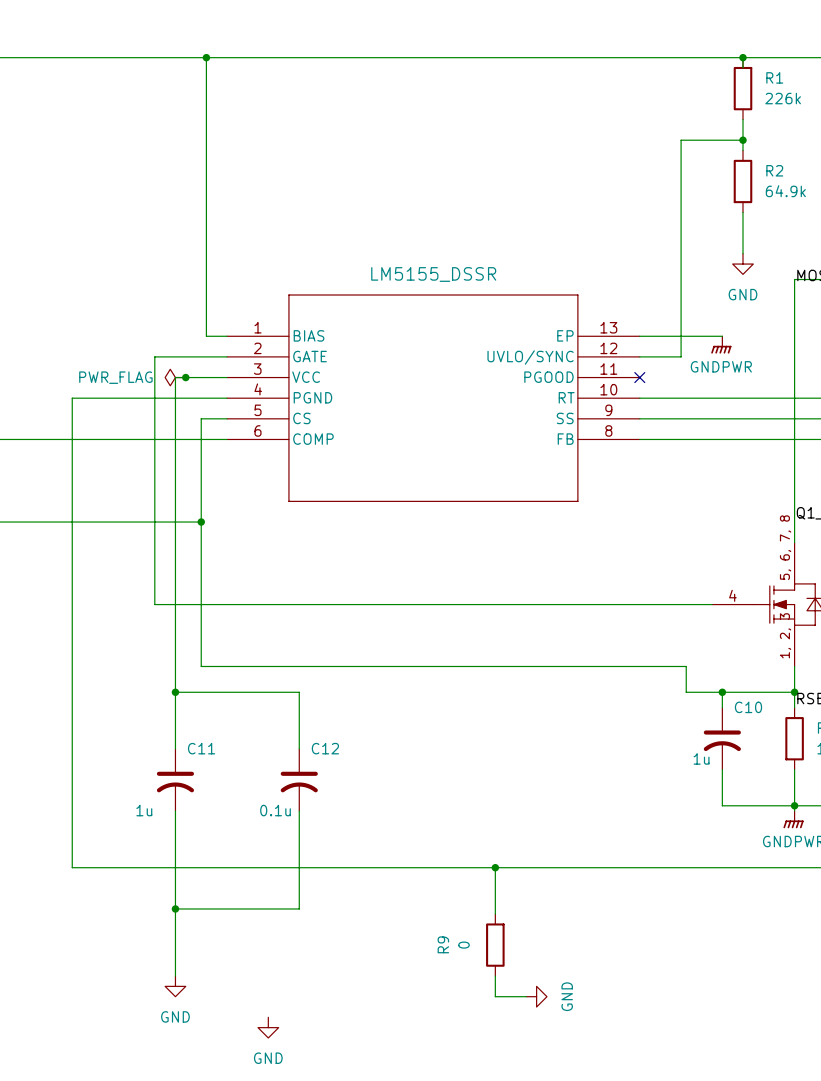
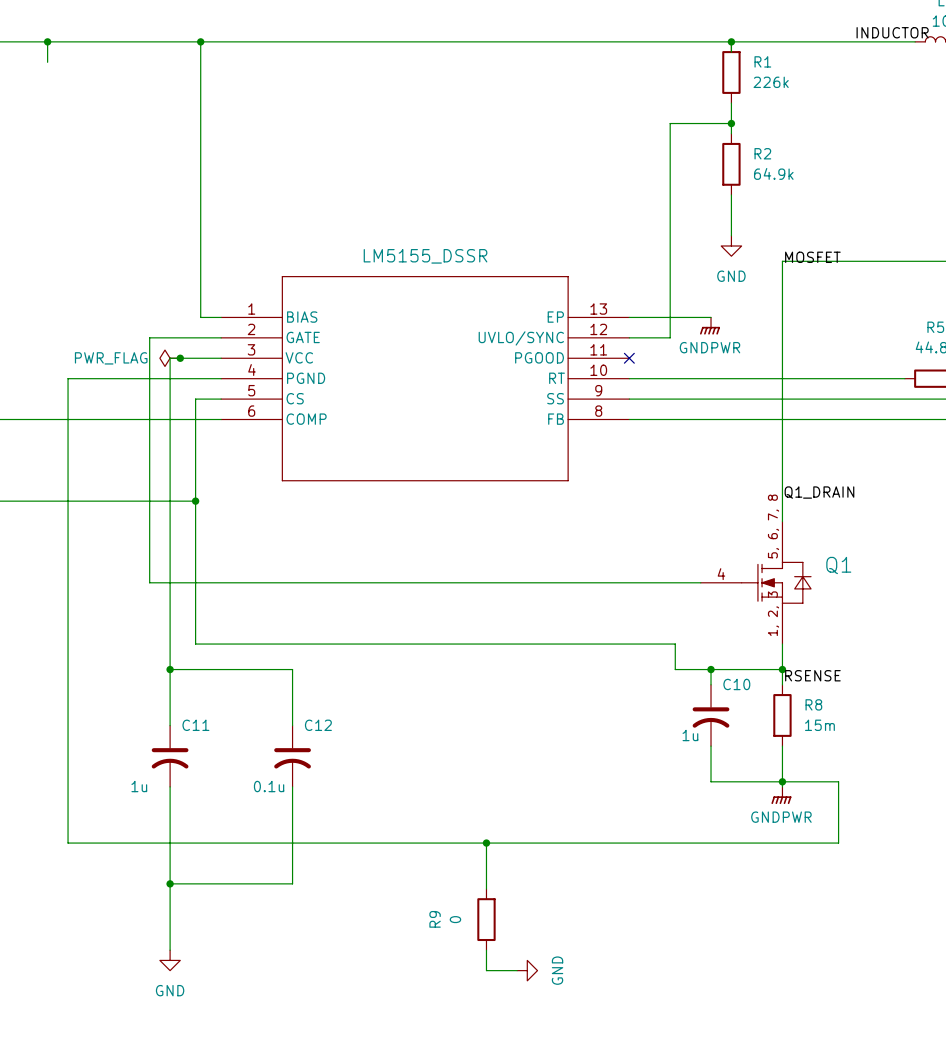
wire: none -> (47, 41) (47, 62)
junction: none -> (47, 41)
power symbol: GND (268, 1027) -> none

